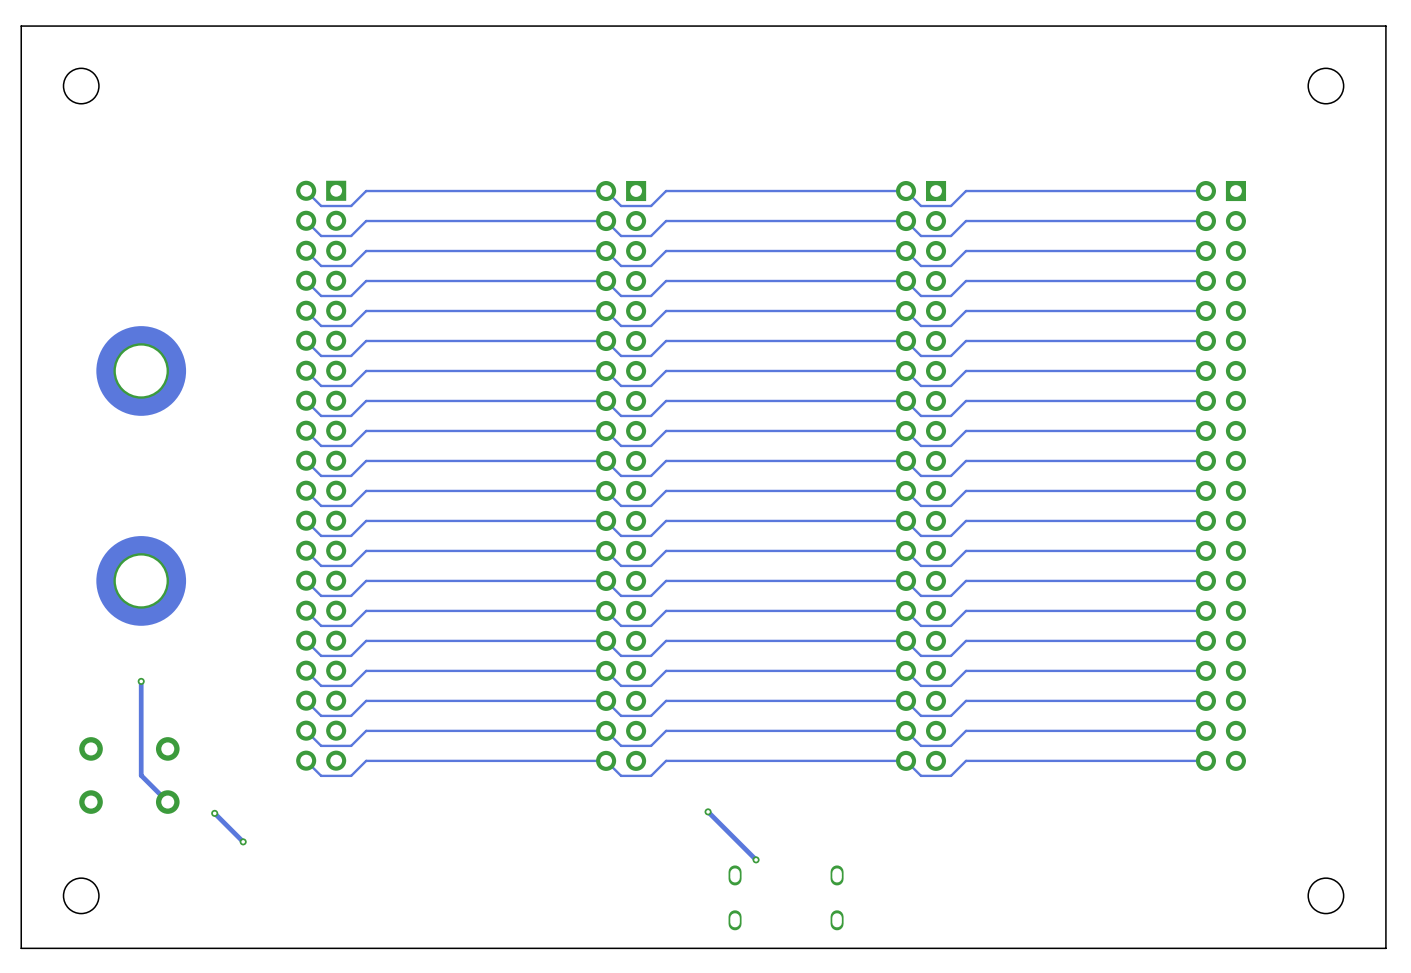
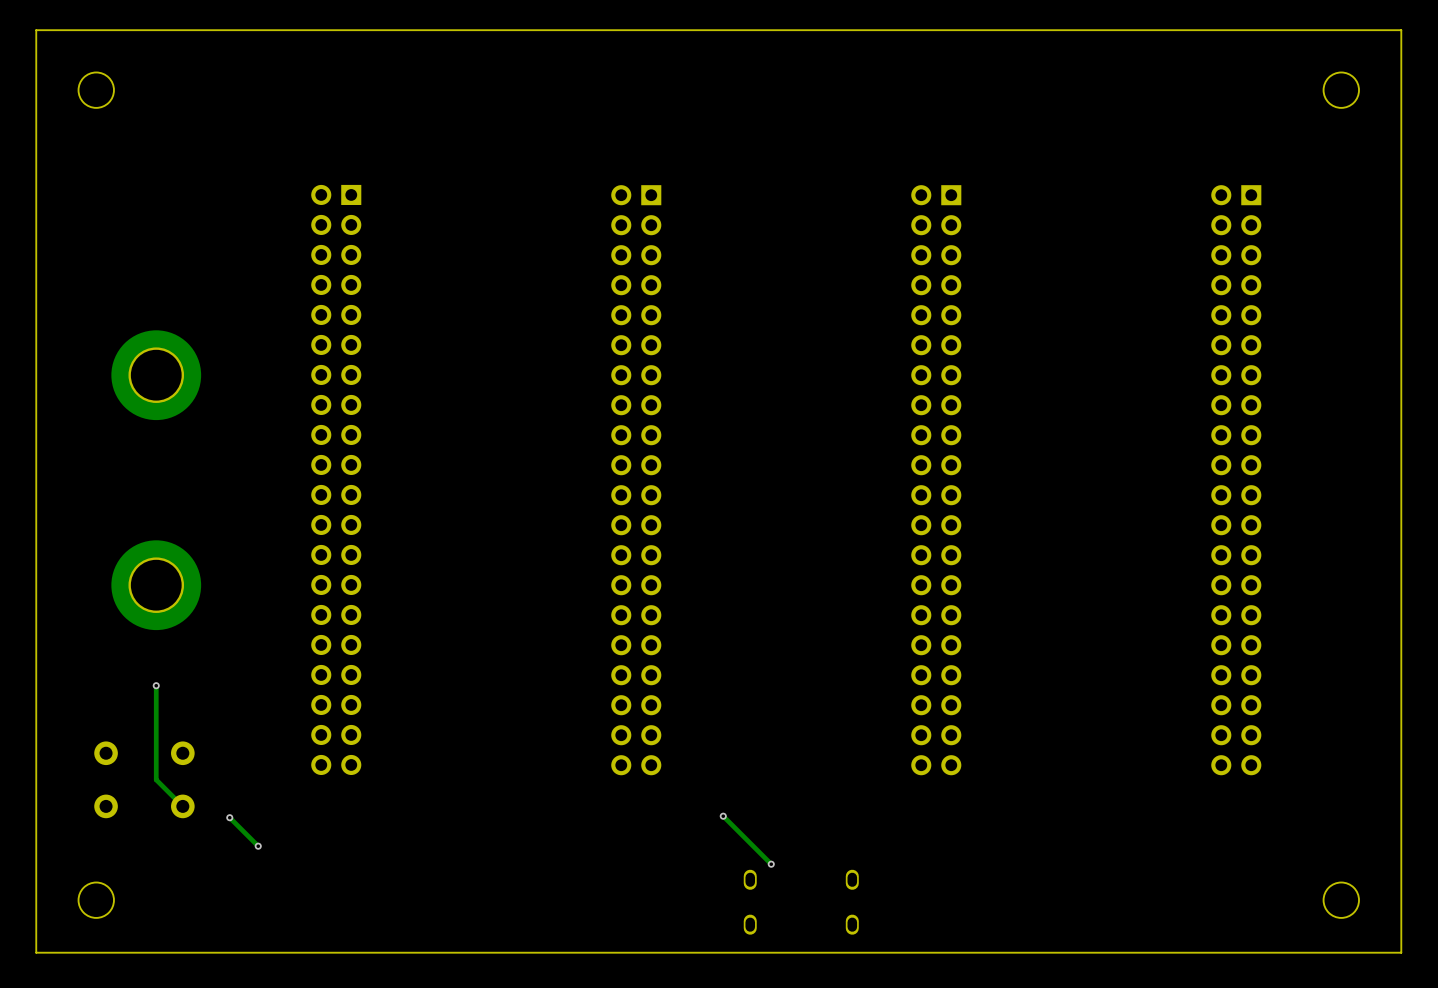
track: (1205, 191) (966, 191) (951, 206) (921, 206) (906, 191) (666, 191) (651, 206) (621, 206) (606, 191) (366, 191) (351, 206) (321, 206) (306, 191) -> none
track: (1205, 221) (966, 221) (951, 236) (921, 236) (906, 221) (666, 221) (651, 236) (621, 236) (606, 221) (366, 221) (351, 236) (321, 236) (306, 221) -> none
track: (1205, 251) (966, 251) (951, 266) (921, 266) (906, 251) (666, 251) (651, 266) (621, 266) (606, 251) (366, 251) (351, 266) (321, 266) (306, 251) -> none
track: (1205, 281) (966, 281) (951, 295) (921, 295) (906, 281) (666, 281) (651, 295) (621, 295) (606, 281) (366, 281) (351, 295) (321, 295) (306, 281) -> none
track: (1205, 310) (966, 310) (951, 325) (921, 325) (906, 310) (666, 310) (651, 325) (621, 325) (606, 310) (366, 310) (351, 325) (321, 325) (306, 310) -> none
track: (1205, 340) (966, 340) (951, 355) (921, 355) (906, 340) (666, 340) (651, 355) (621, 355) (606, 340) (366, 340) (351, 355) (321, 355) (306, 340) -> none
track: (1205, 370) (966, 370) (951, 385) (921, 385) (906, 370) (666, 370) (651, 385) (621, 385) (606, 370) (366, 370) (351, 385) (321, 385) (306, 370) -> none
track: (1205, 400) (966, 400) (951, 415) (921, 415) (906, 400) (666, 400) (651, 415) (621, 415) (606, 400) (366, 400) (351, 415) (321, 415) (306, 400) -> none
track: (1205, 430) (966, 430) (951, 445) (921, 445) (906, 430) (666, 430) (651, 445) (621, 445) (606, 430) (366, 430) (351, 445) (321, 445) (306, 430) -> none
track: (1205, 460) (966, 460) (951, 475) (921, 475) (906, 460) (666, 460) (651, 475) (621, 475) (606, 460) (366, 460) (351, 475) (321, 475) (306, 460) -> none
track: (1205, 490) (966, 490) (951, 505) (921, 505) (906, 490) (666, 490) (651, 505) (621, 505) (606, 490) (366, 490) (351, 505) (321, 505) (306, 490) -> none
track: (1205, 520) (966, 520) (951, 535) (921, 535) (906, 520) (666, 520) (651, 535) (621, 535) (606, 520) (366, 520) (351, 535) (321, 535) (306, 520) -> none
track: (1205, 550) (966, 550) (951, 565) (921, 565) (906, 550) (666, 550) (651, 565) (621, 565) (606, 550) (366, 550) (351, 565) (321, 565) (306, 550) -> none
track: (1205, 580) (966, 580) (951, 595) (921, 595) (906, 580) (666, 580) (651, 595) (621, 595) (606, 580) (366, 580) (351, 595) (321, 595) (306, 580) -> none
track: (1205, 610) (966, 610) (951, 625) (921, 625) (906, 610) (666, 610) (651, 625) (621, 625) (606, 610) (366, 610) (351, 625) (321, 625) (306, 610) -> none
track: (1205, 640) (966, 640) (951, 655) (921, 655) (906, 640) (666, 640) (651, 655) (621, 655) (606, 640) (366, 640) (351, 655) (321, 655) (306, 640) -> none
track: (1205, 670) (966, 670) (951, 685) (921, 685) (906, 670) (666, 670) (651, 685) (621, 685) (606, 670) (366, 670) (351, 685) (321, 685) (306, 670) -> none
track: (1205, 700) (966, 700) (951, 715) (921, 715) (906, 700) (666, 700) (651, 715) (621, 715) (606, 700) (366, 700) (351, 715) (321, 715) (306, 700) -> none
track: (1205, 730) (966, 730) (951, 745) (921, 745) (906, 730) (666, 730) (651, 745) (621, 745) (606, 730) (366, 730) (351, 745) (321, 745) (306, 730) -> none
track: (1205, 760) (966, 760) (951, 775) (921, 775) (906, 760) (666, 760) (651, 775) (621, 775) (606, 760) (366, 760) (351, 775) (321, 775) (306, 760) -> none

